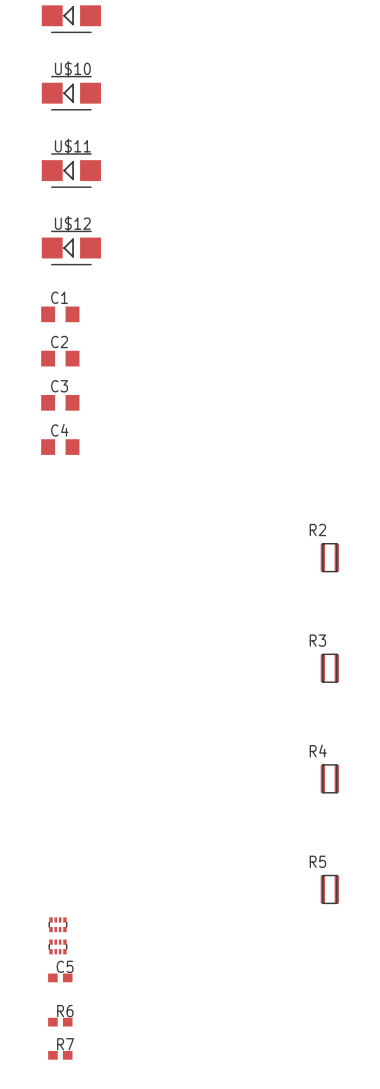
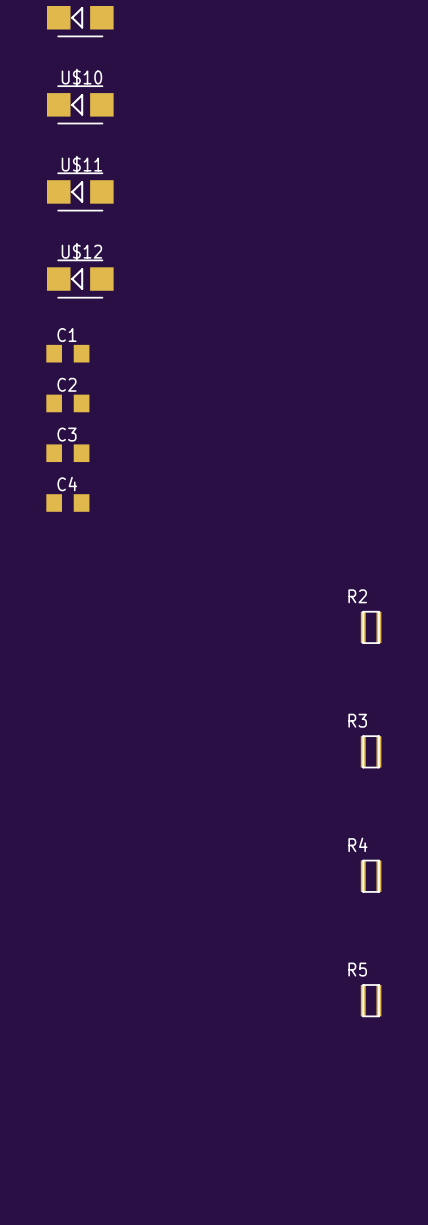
part: (57, 924) -> none
part: (57, 946) -> none
C5: (60, 977) -> none
R6: (60, 1022) -> none
R7: (60, 1055) -> none

